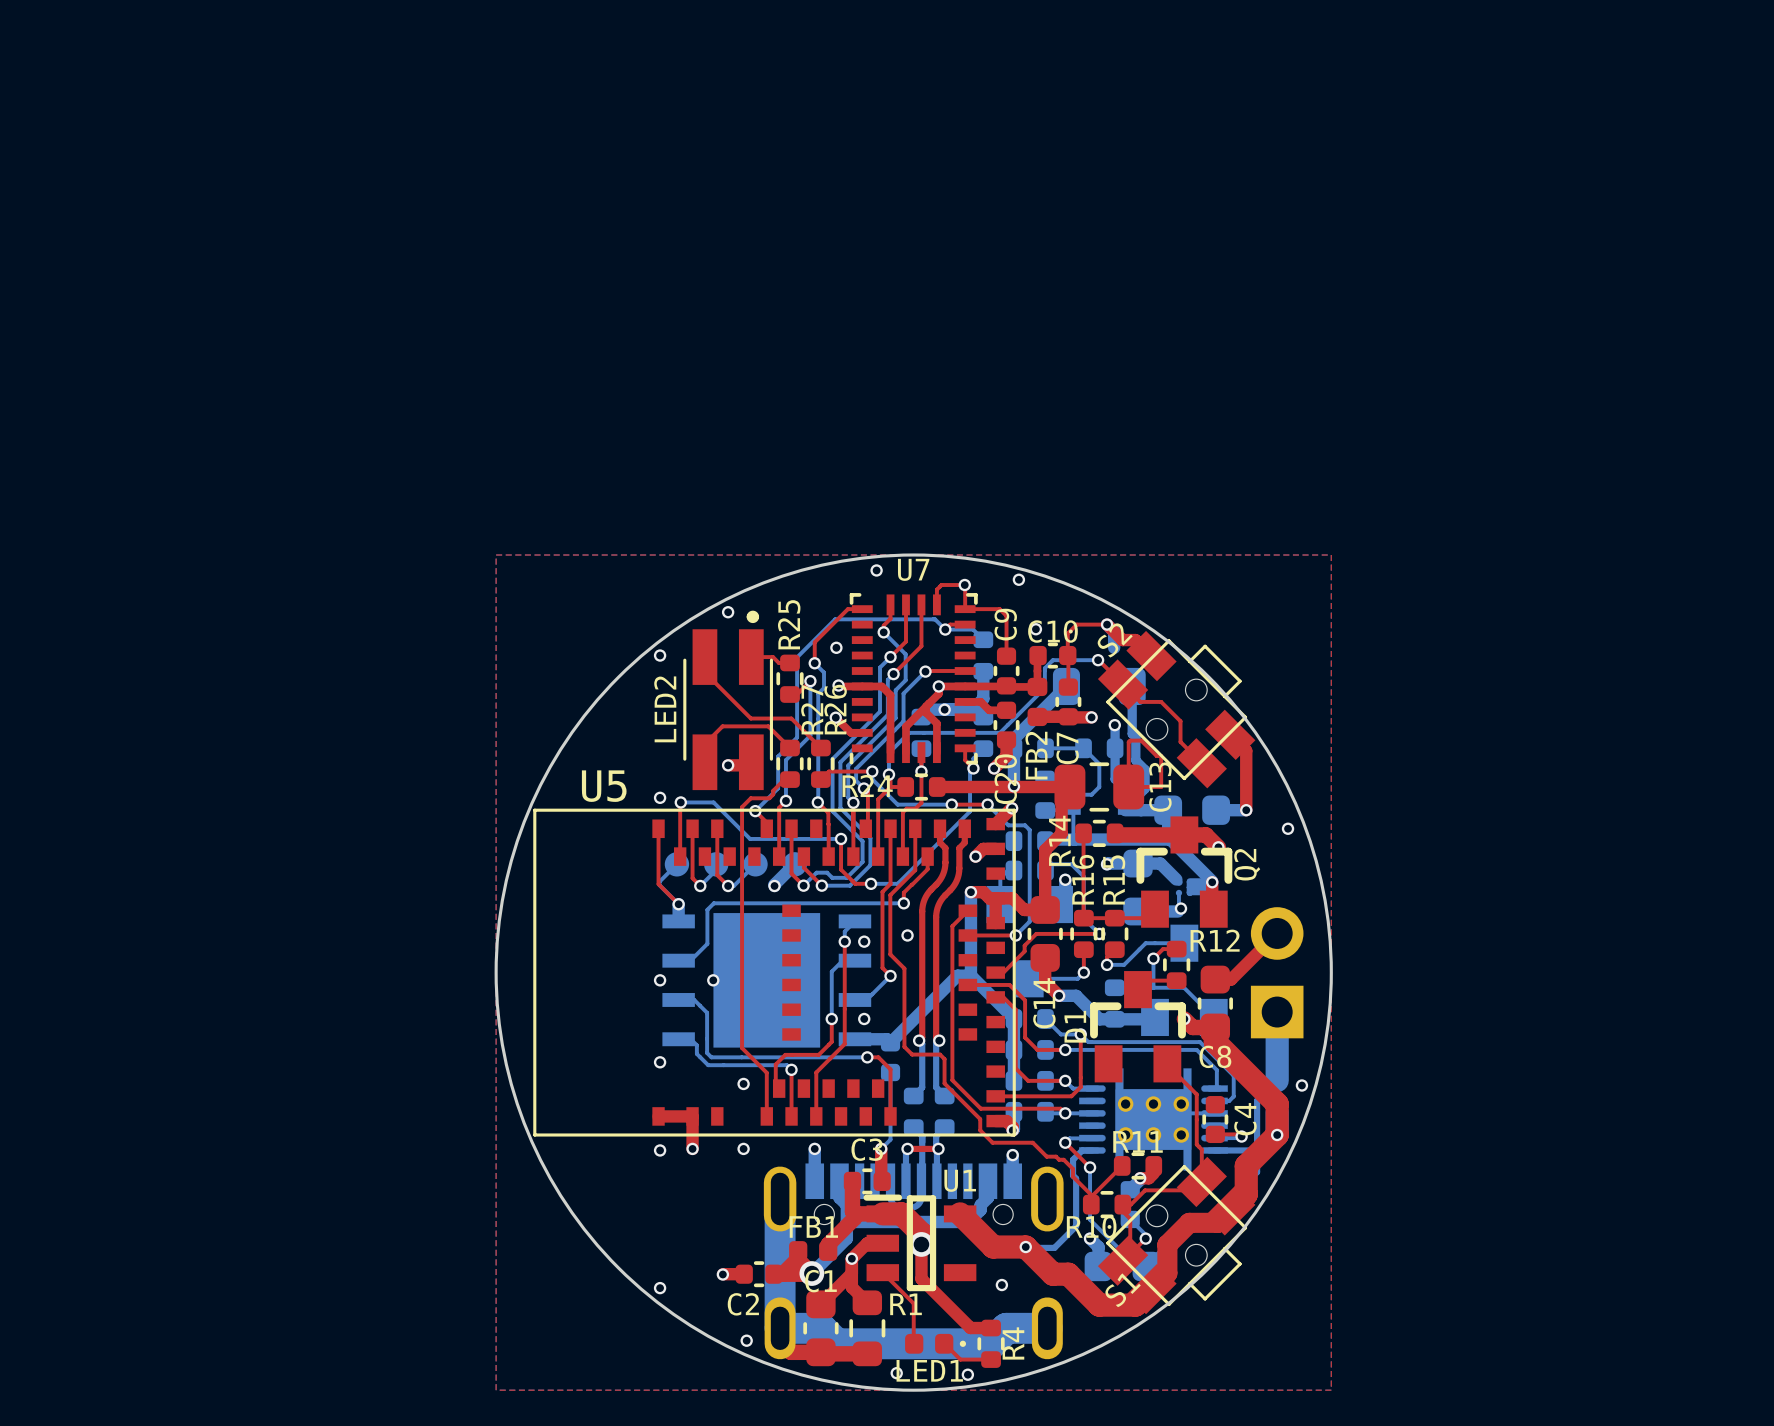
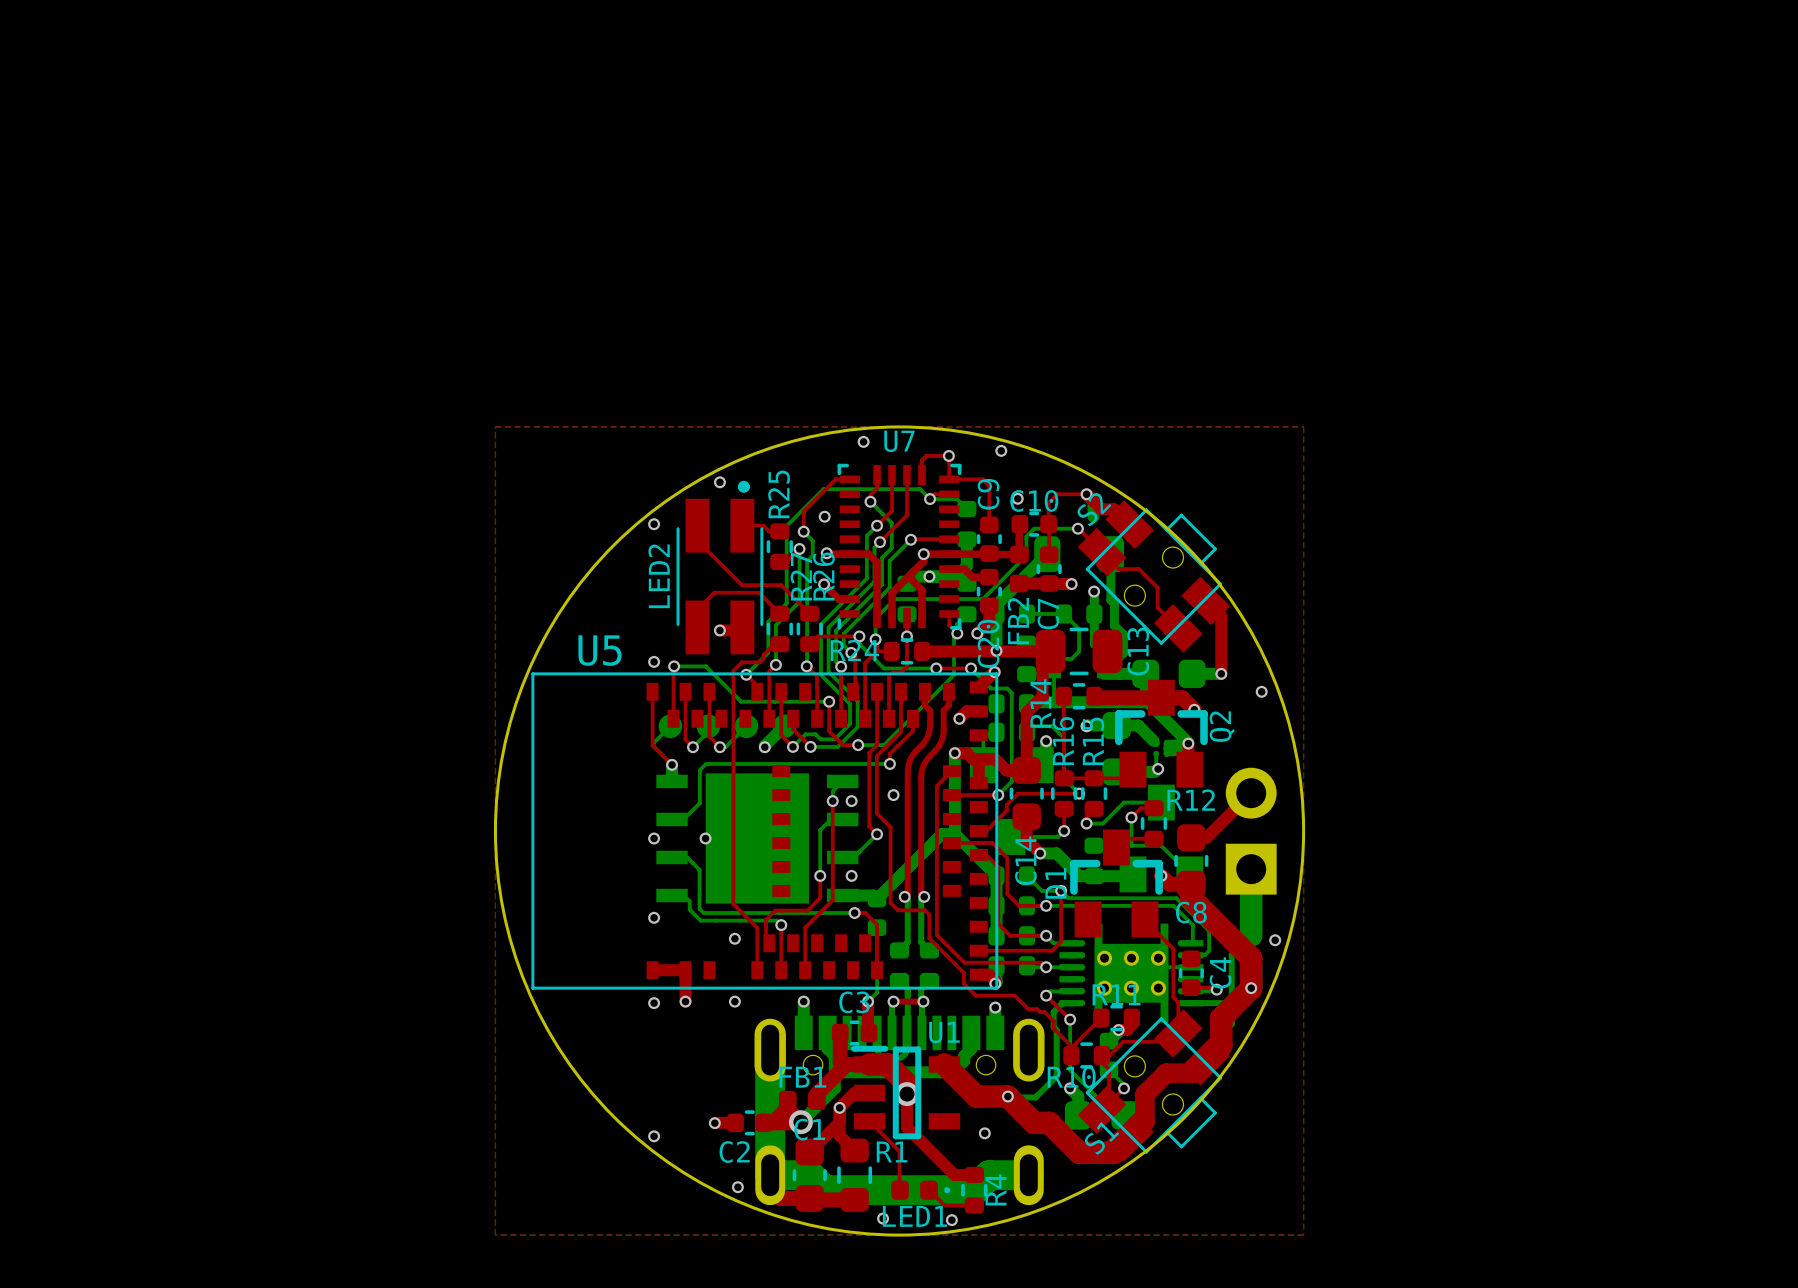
top track: (1130, 740) (1141, 740) (1156, 756) (1161, 756) (1161, 787) (1128, 787) (1130, 740) -> none

